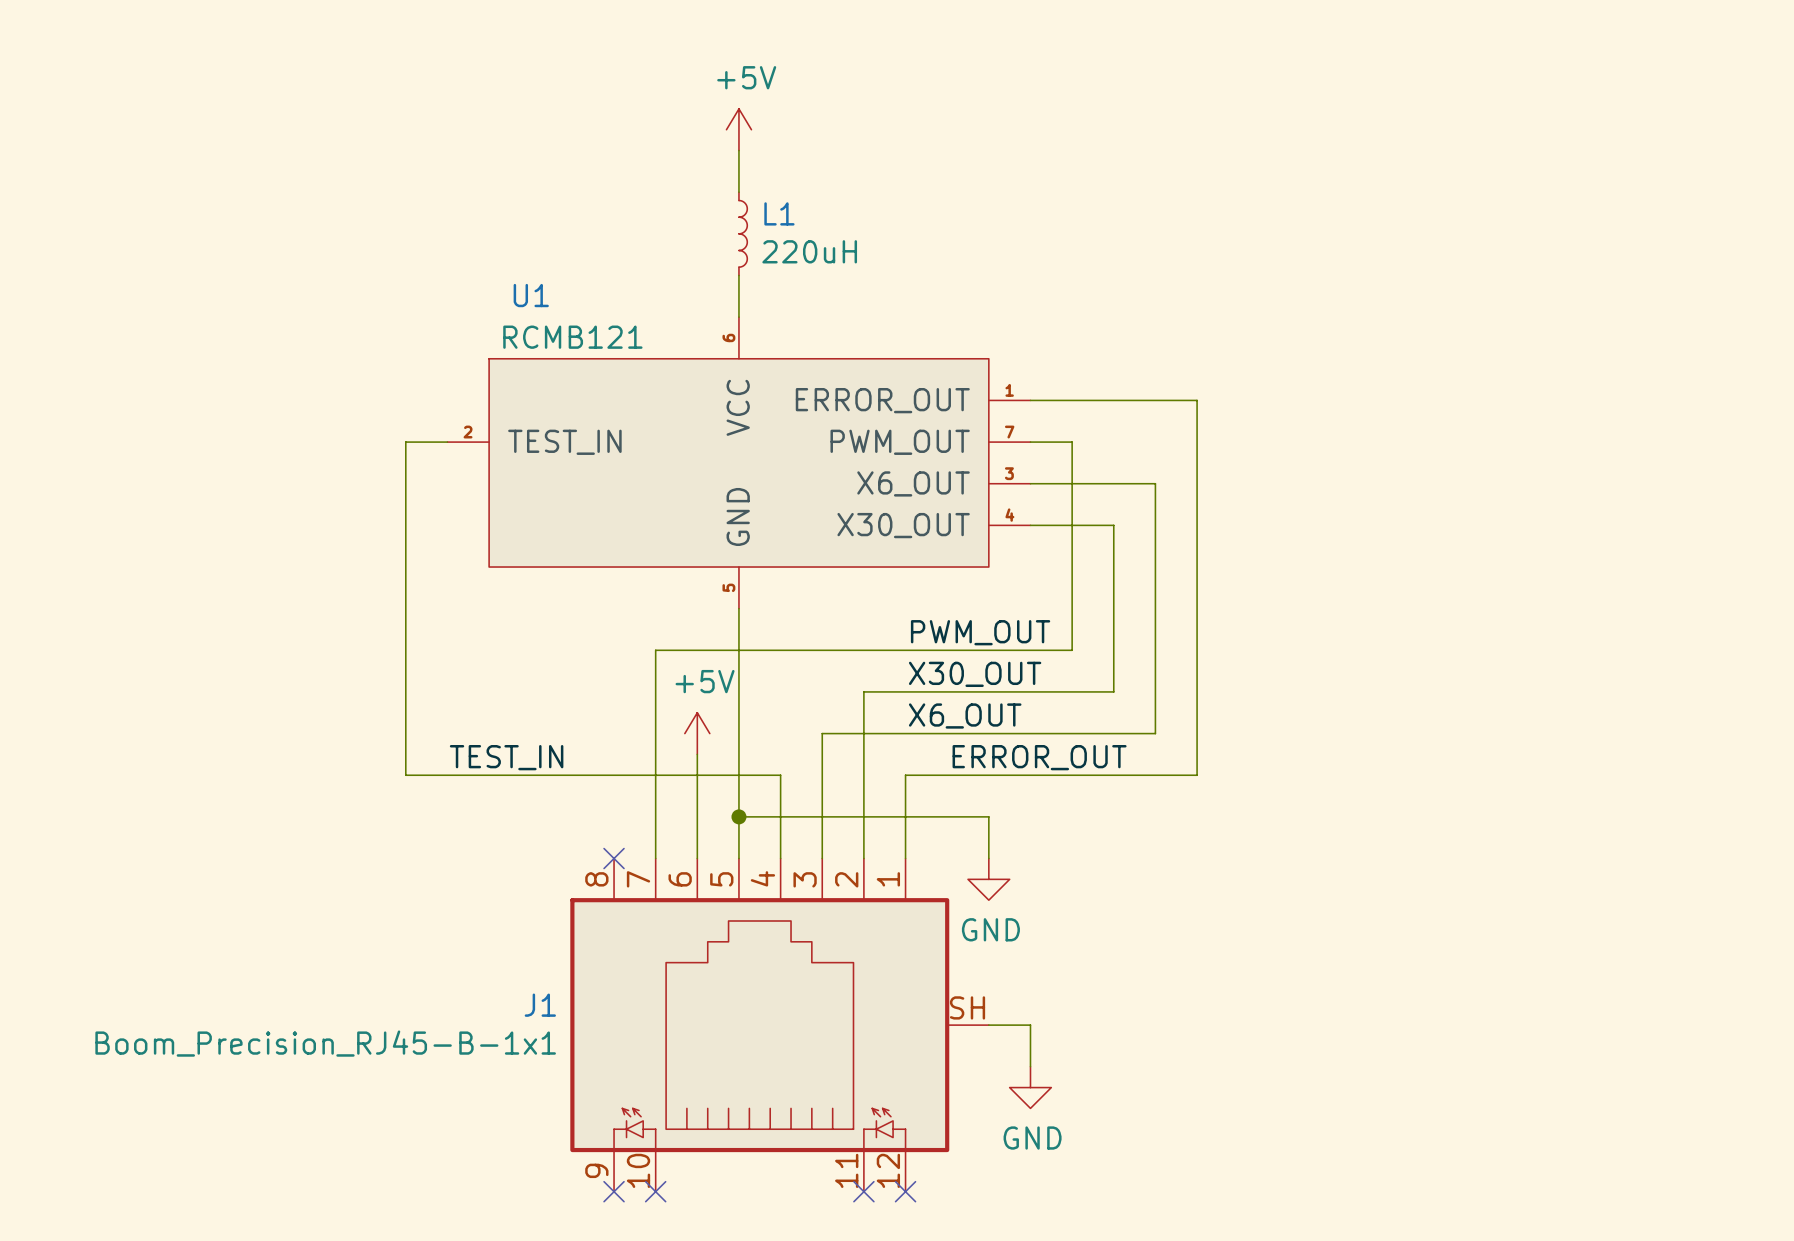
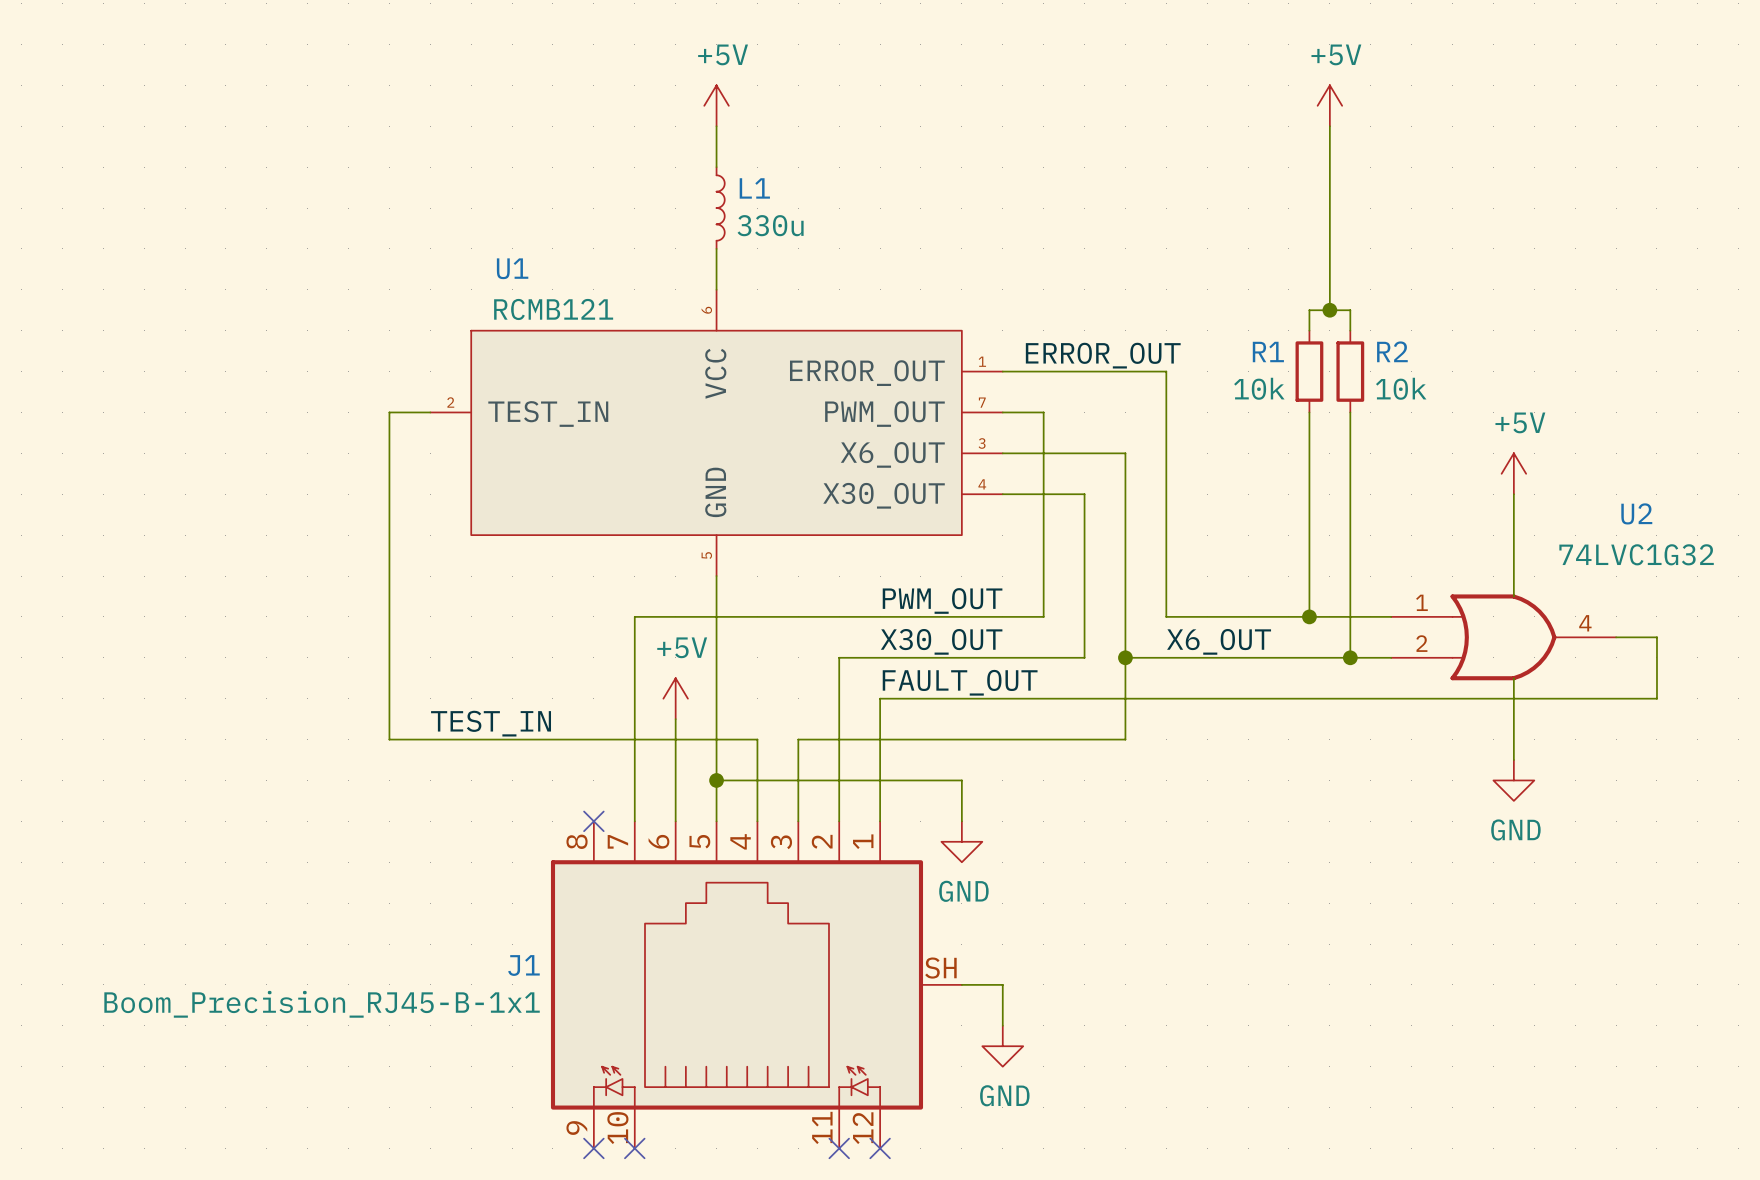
power symbol: none -> +5V (1329, 105)
wire: none -> (1329, 126) (1329, 310)
L1 value: 220uH (809, 251) -> 330u (770, 225)
junction: none -> (1329, 310)
wire: none -> (1309, 330) (1309, 310) (1350, 310) (1350, 330)
R1: none -> 10k (1309, 371)
R2: none -> 10k (1350, 371)
wire: none -> (1309, 412) (1309, 616)
wire: none -> (1350, 412) (1350, 657)
power symbol: none -> +5V (1513, 473)
wire: none -> (1513, 494) (1513, 596)
wire: (1197, 650) (1197, 775) (1155, 775) -> (1166, 616) (1391, 616)
junction: none -> (1309, 616)
U2: none -> 74LVC1G32 (1503, 637)
wire: none -> (1616, 637) (1656, 637) (1656, 698) (1125, 698) (1125, 739)
label: none -> X6_OUT (1219, 641)
wire: none -> (1125, 657) (1391, 657)
junction: none -> (1125, 657)
junction: none -> (1350, 657)
wire: none -> (1513, 678) (1513, 760)
label: X6_OUT (965, 716) -> FAULT_OUT (960, 682)
wire: (905, 733) (822, 733) (822, 775) -> (880, 698) (880, 739) (798, 739)
label position: ERROR_OUT (1039, 757) -> ERROR_OUT (1103, 355)
power symbol: none -> GND (1513, 780)

